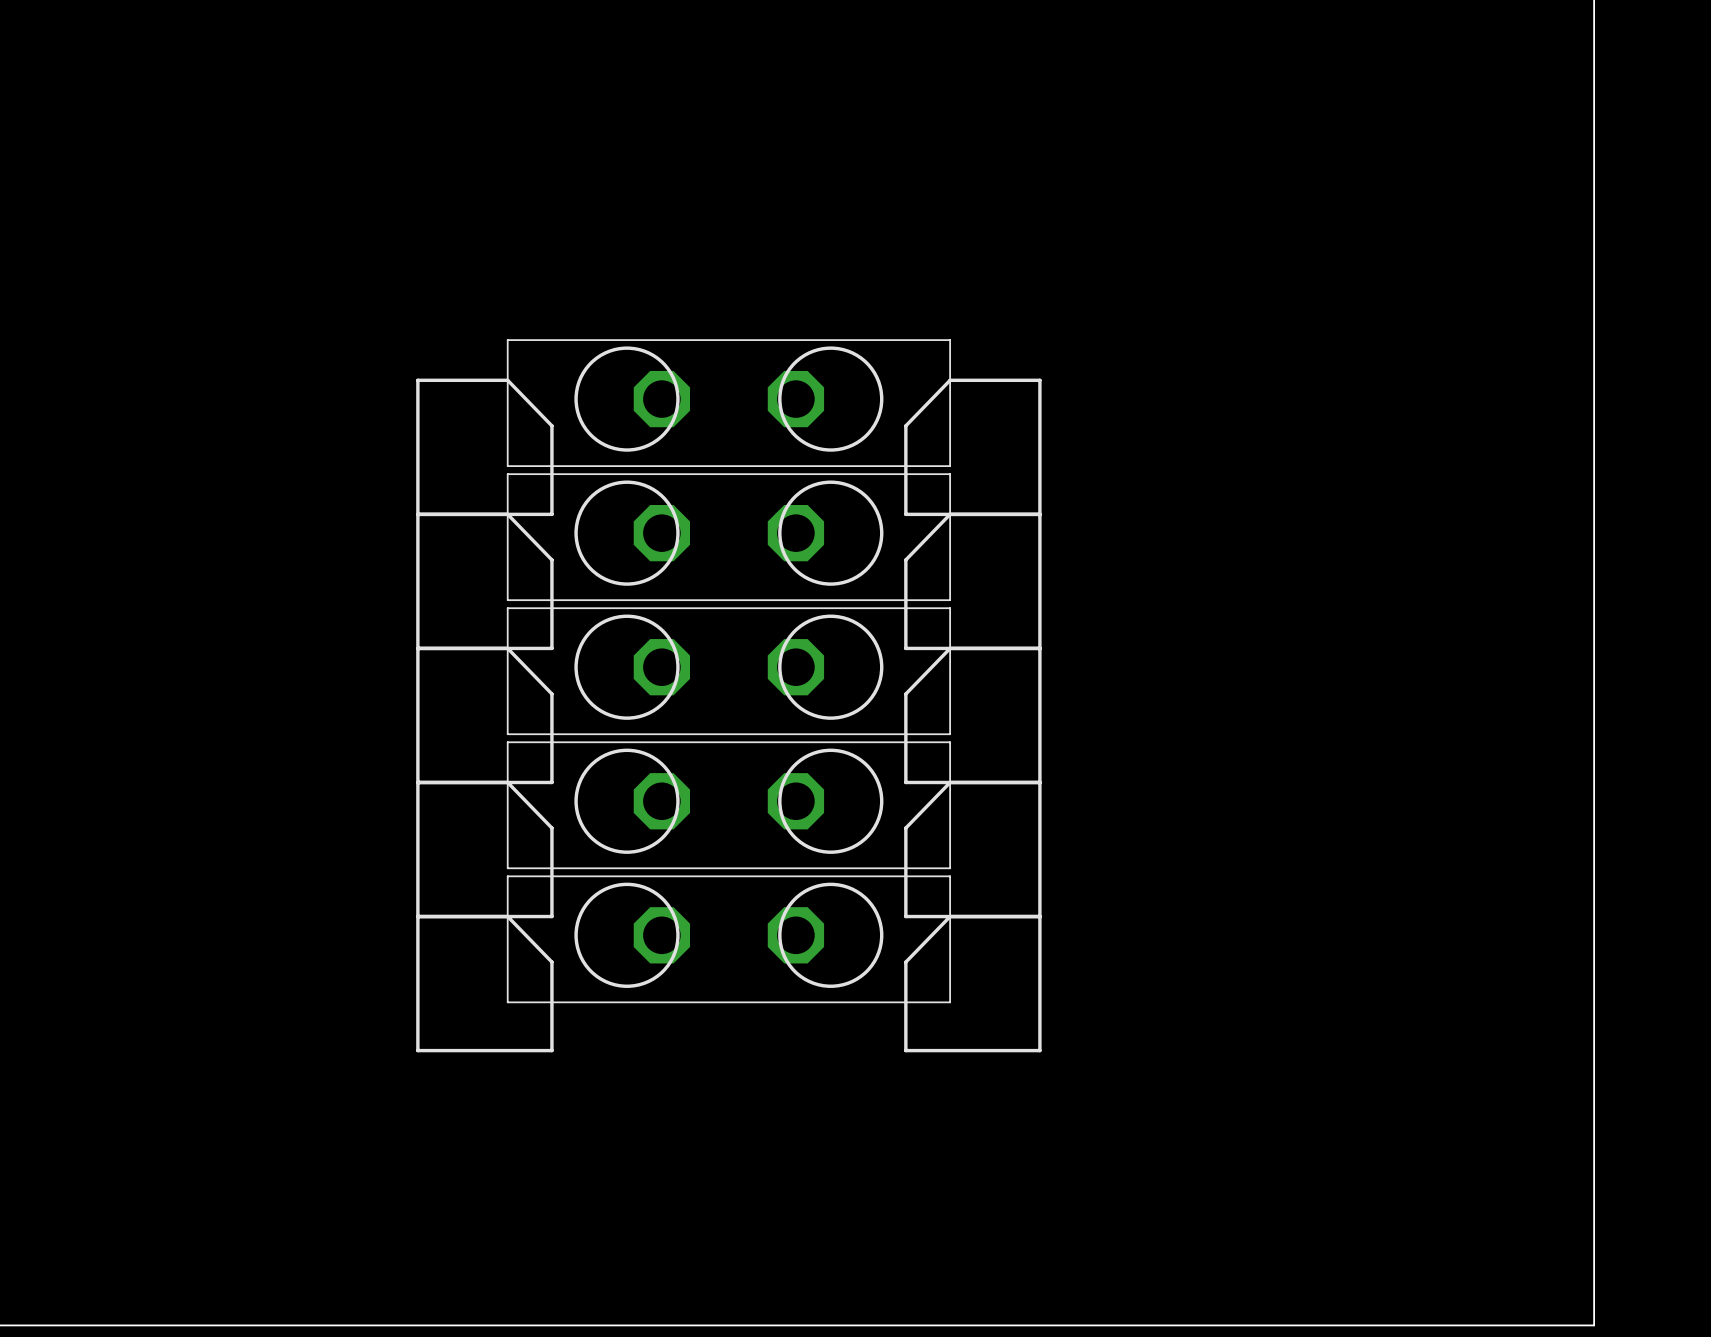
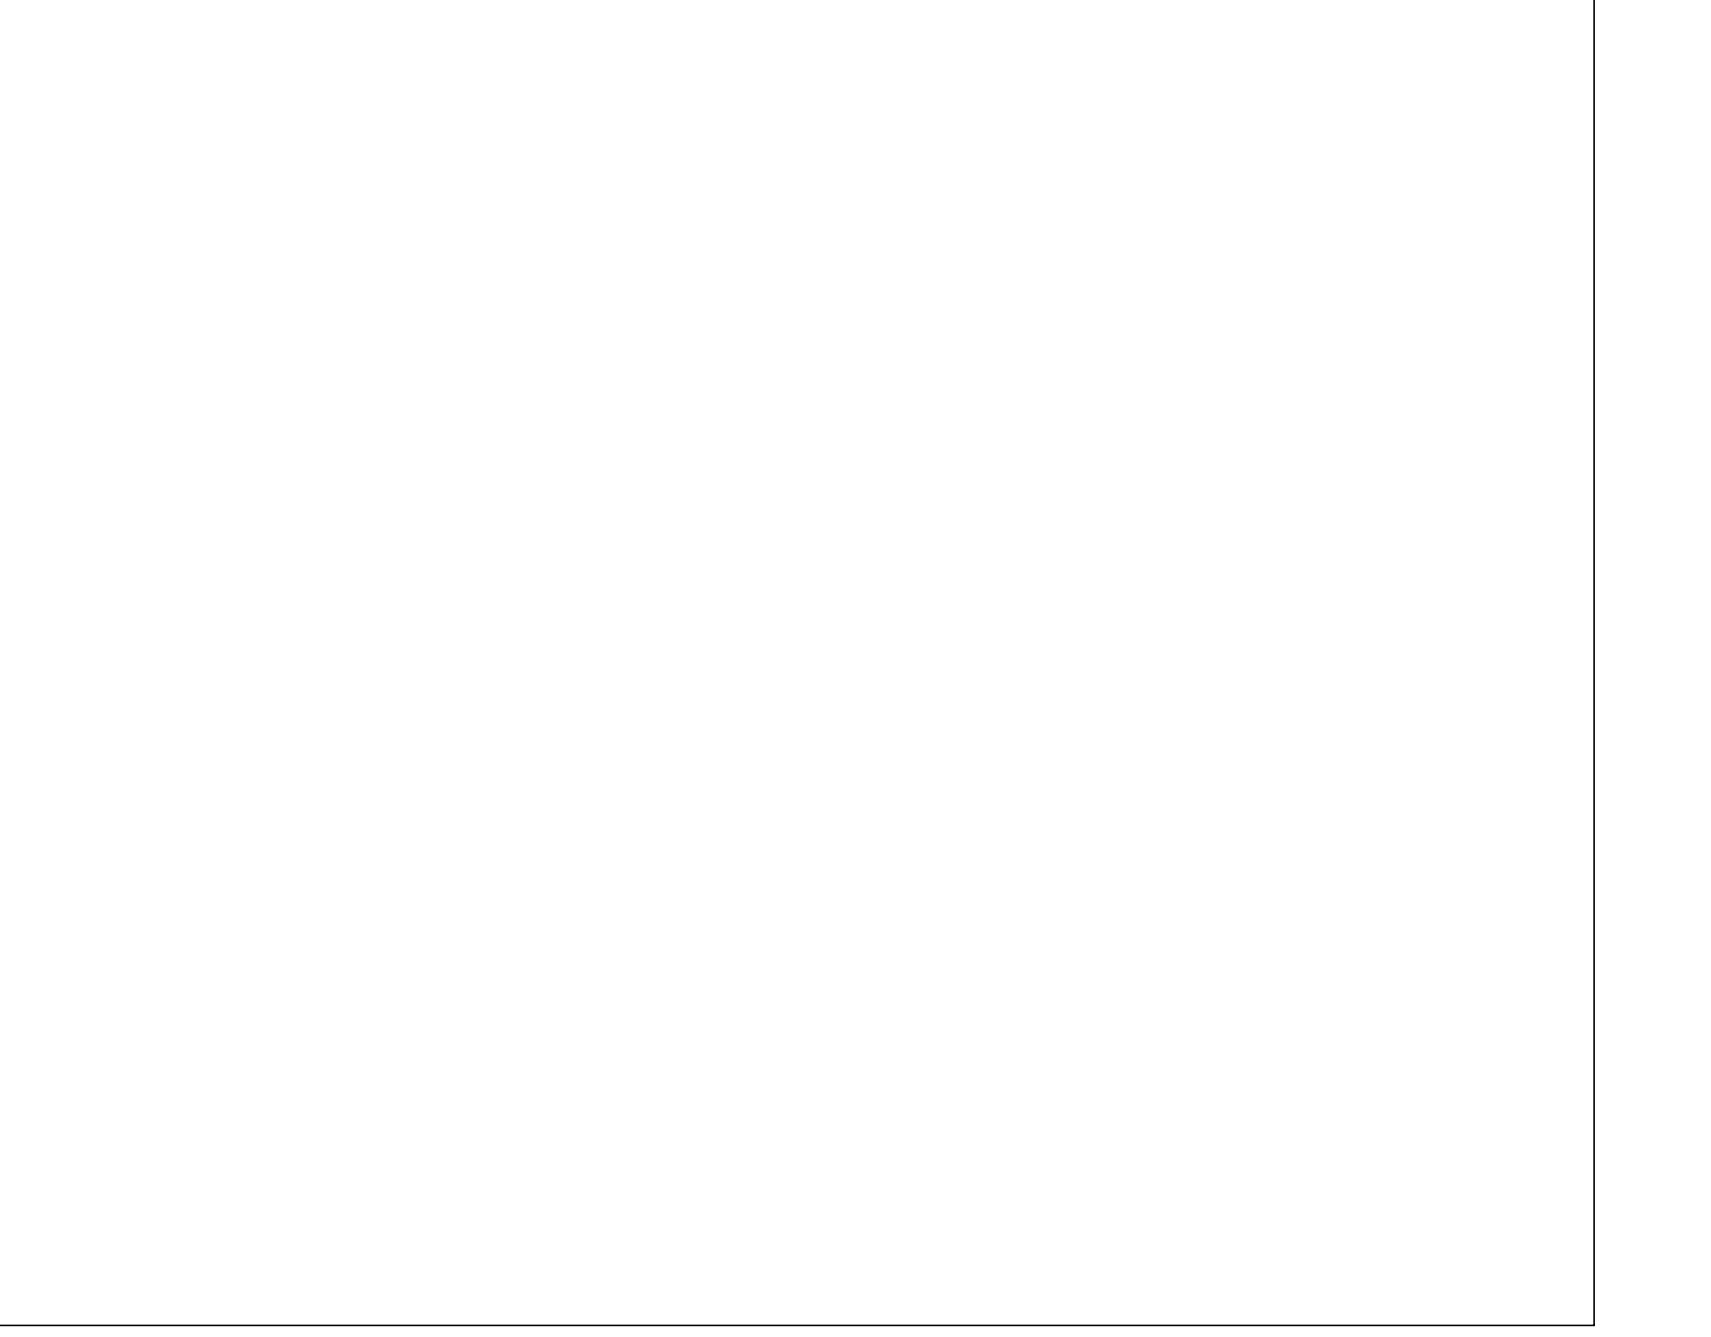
part: (728, 696) -> none

